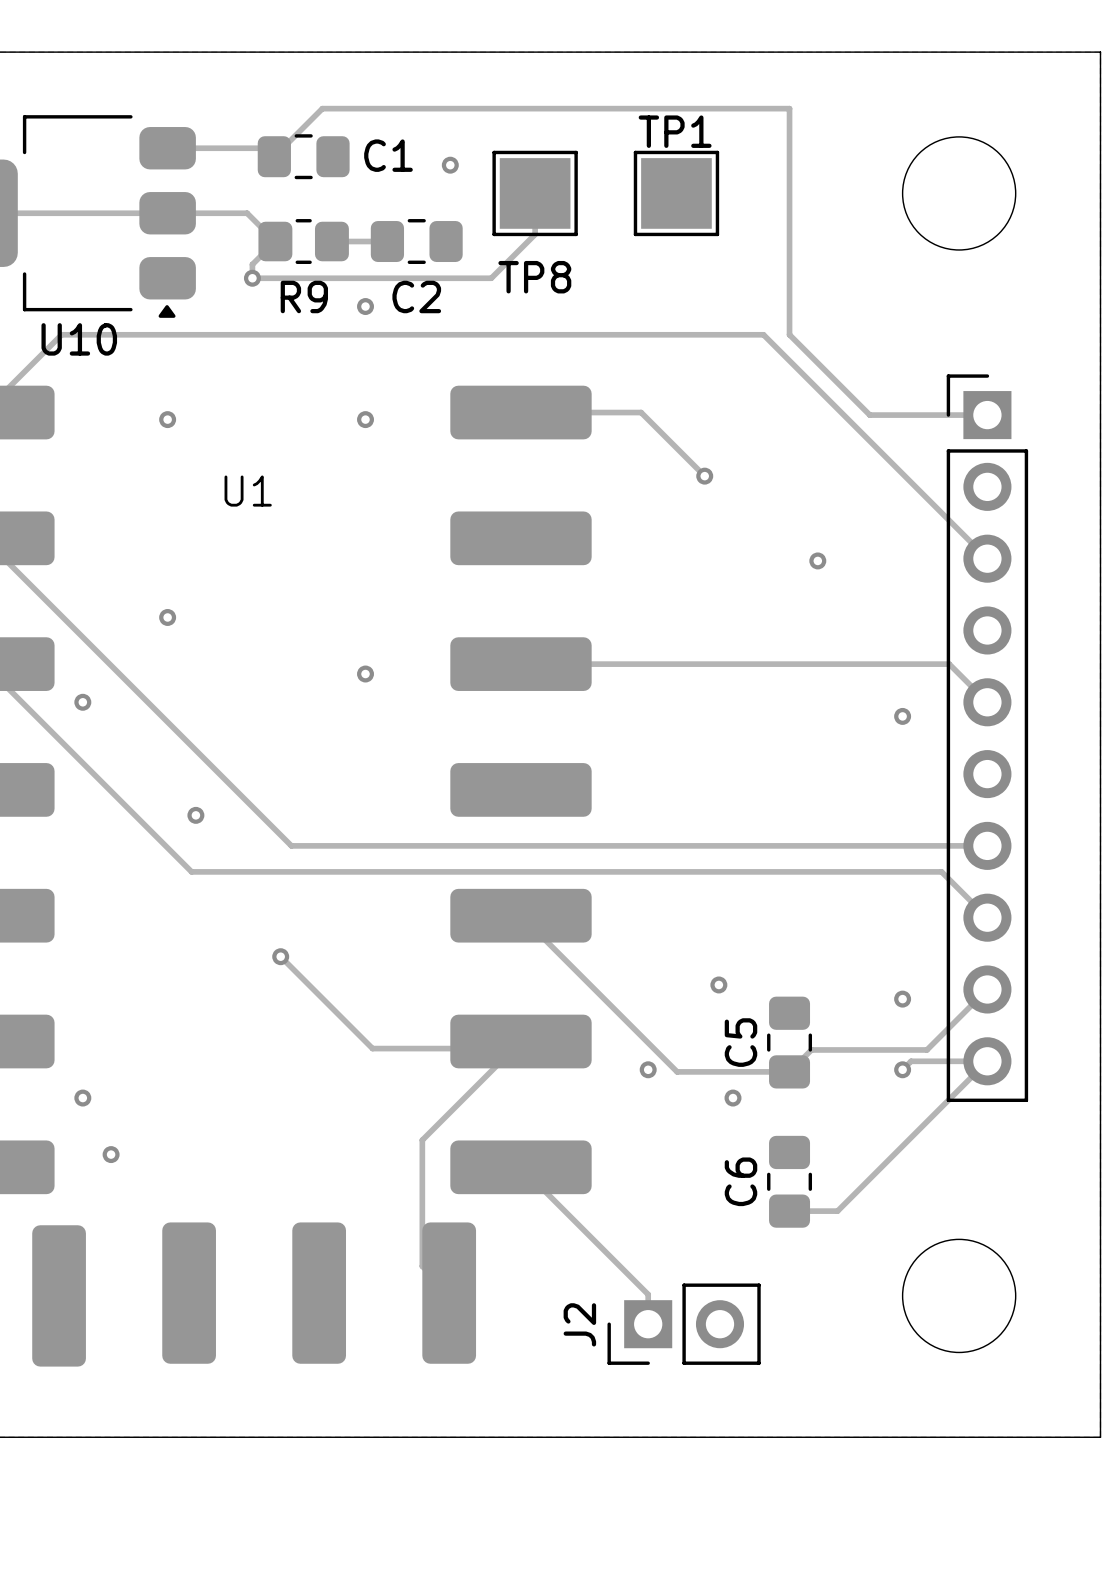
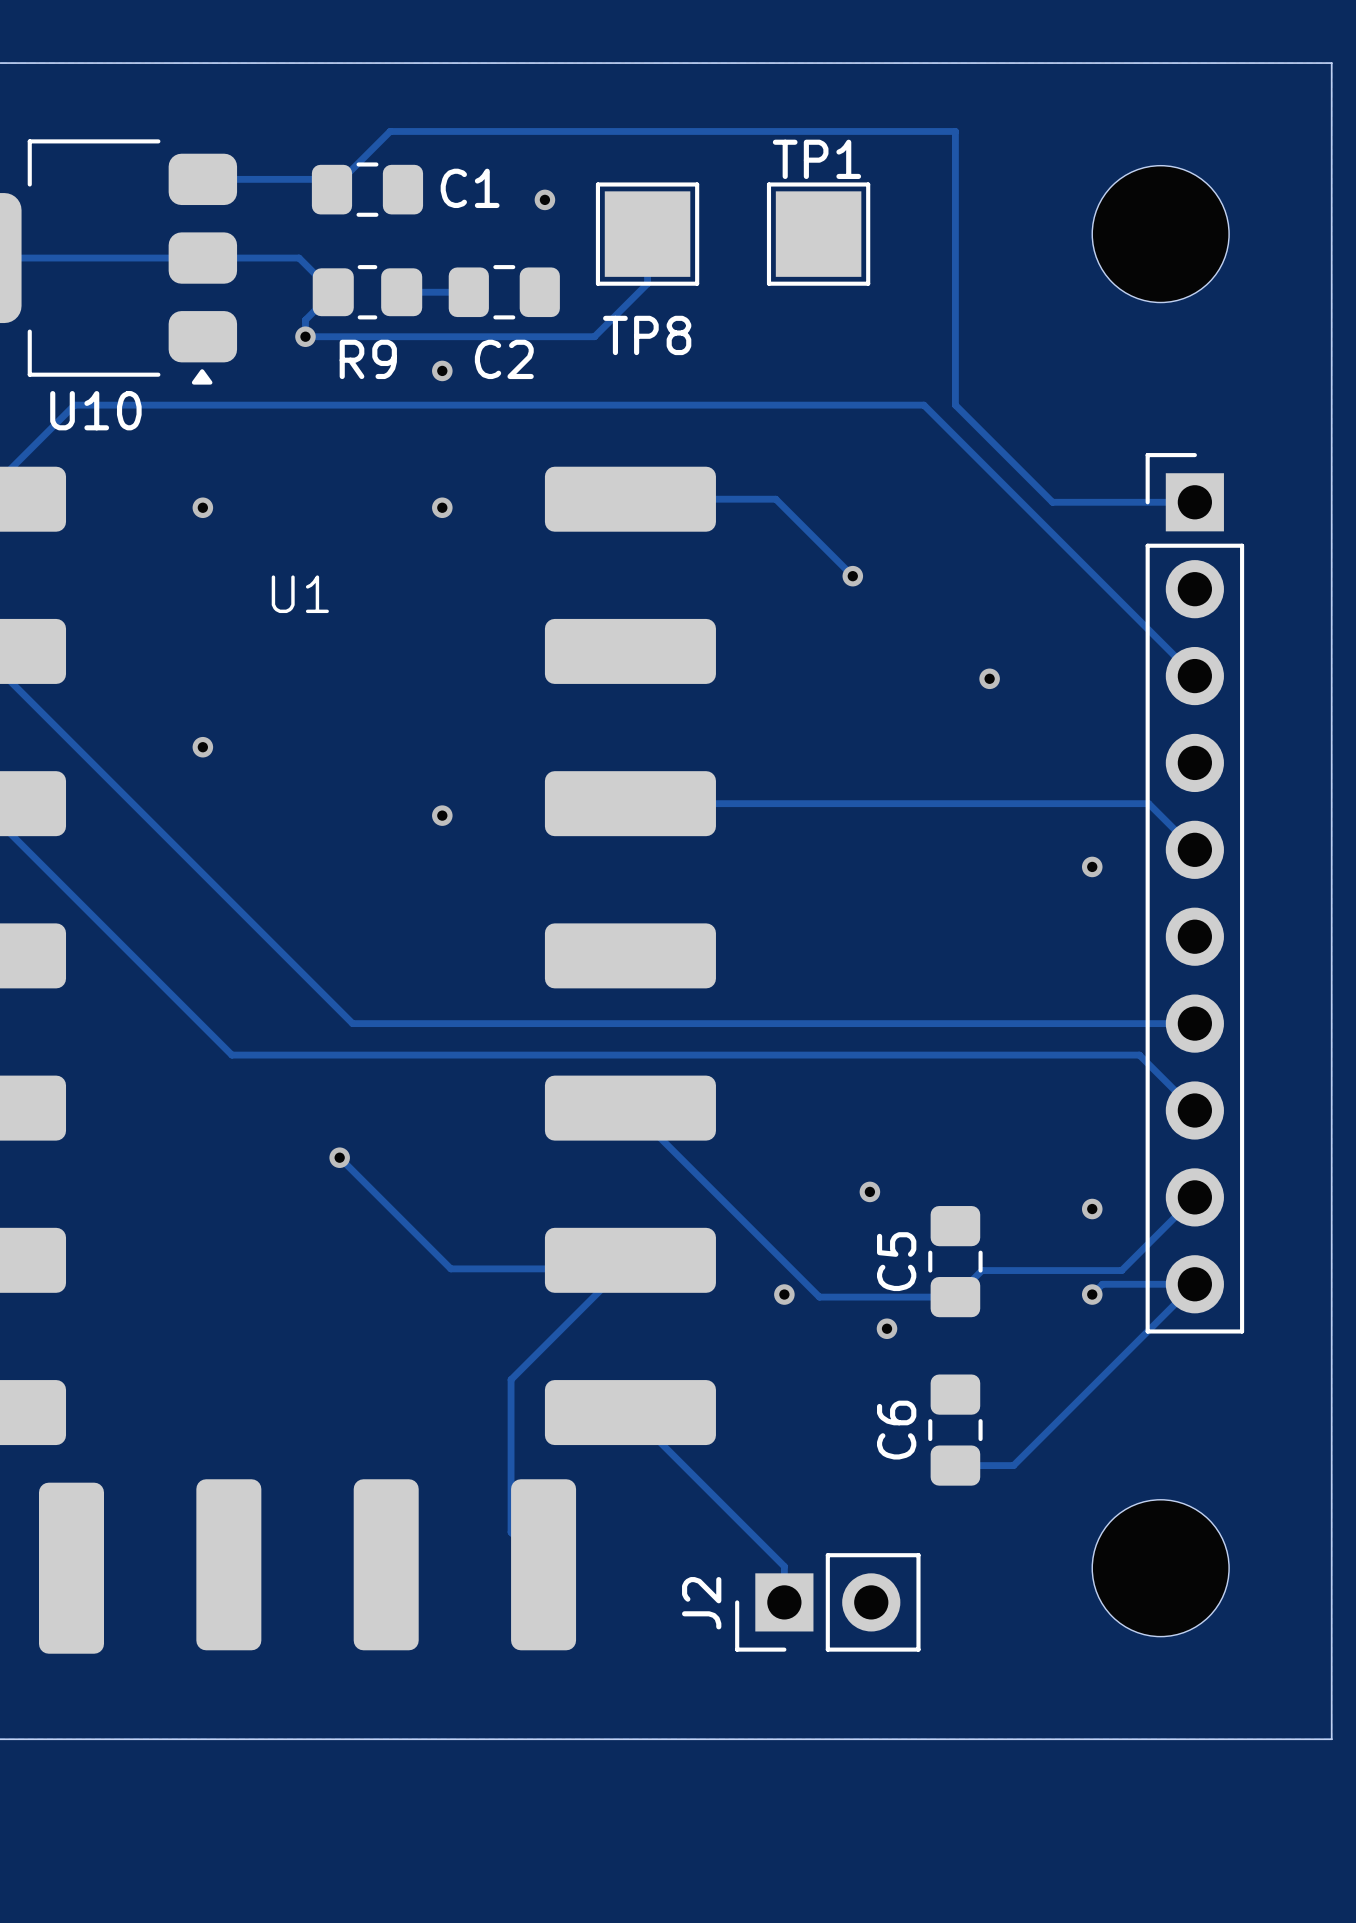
via: (82, 702) -> none
via: (195, 815) -> none
via: (82, 1098) -> none
via: (111, 1154) -> none

